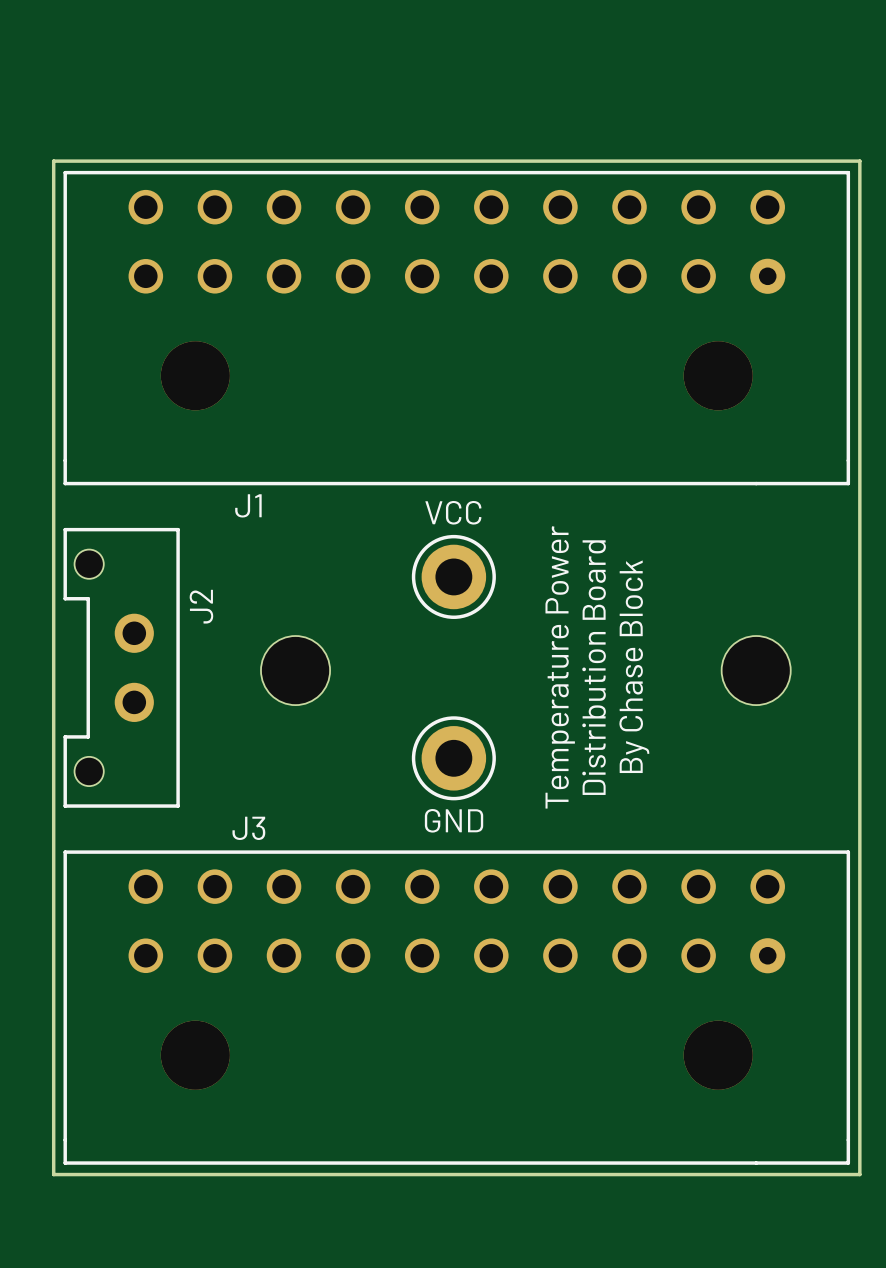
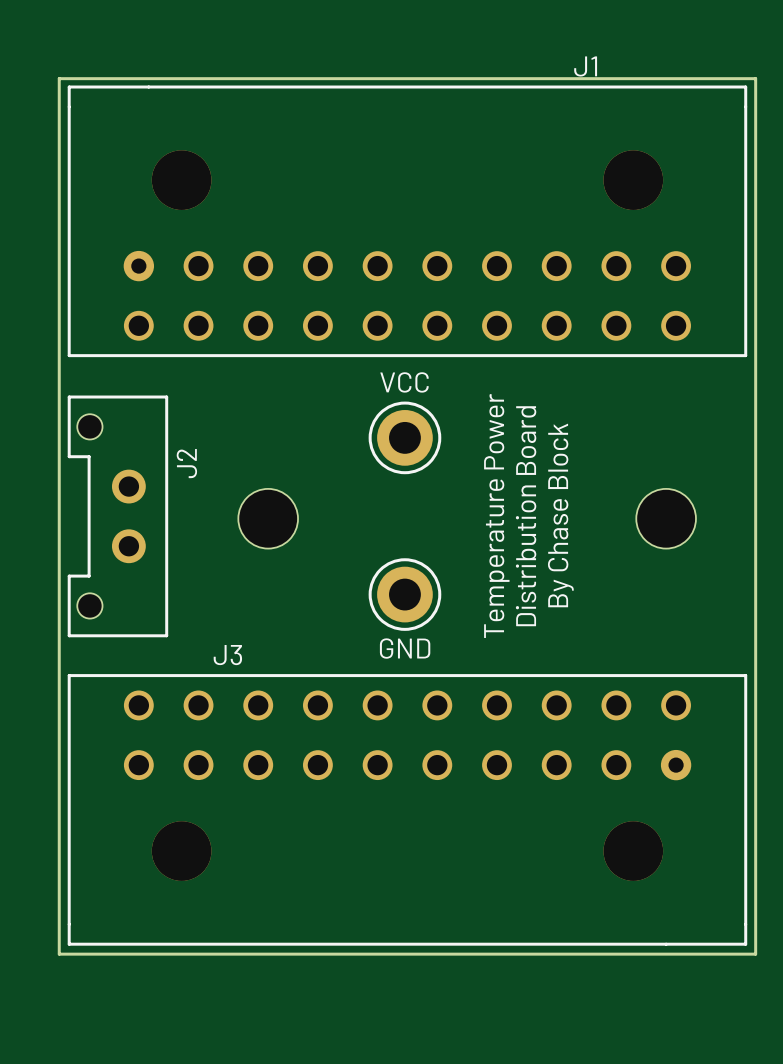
J1 rotation: 0° (456, 328) -> 180° (407, 221)

